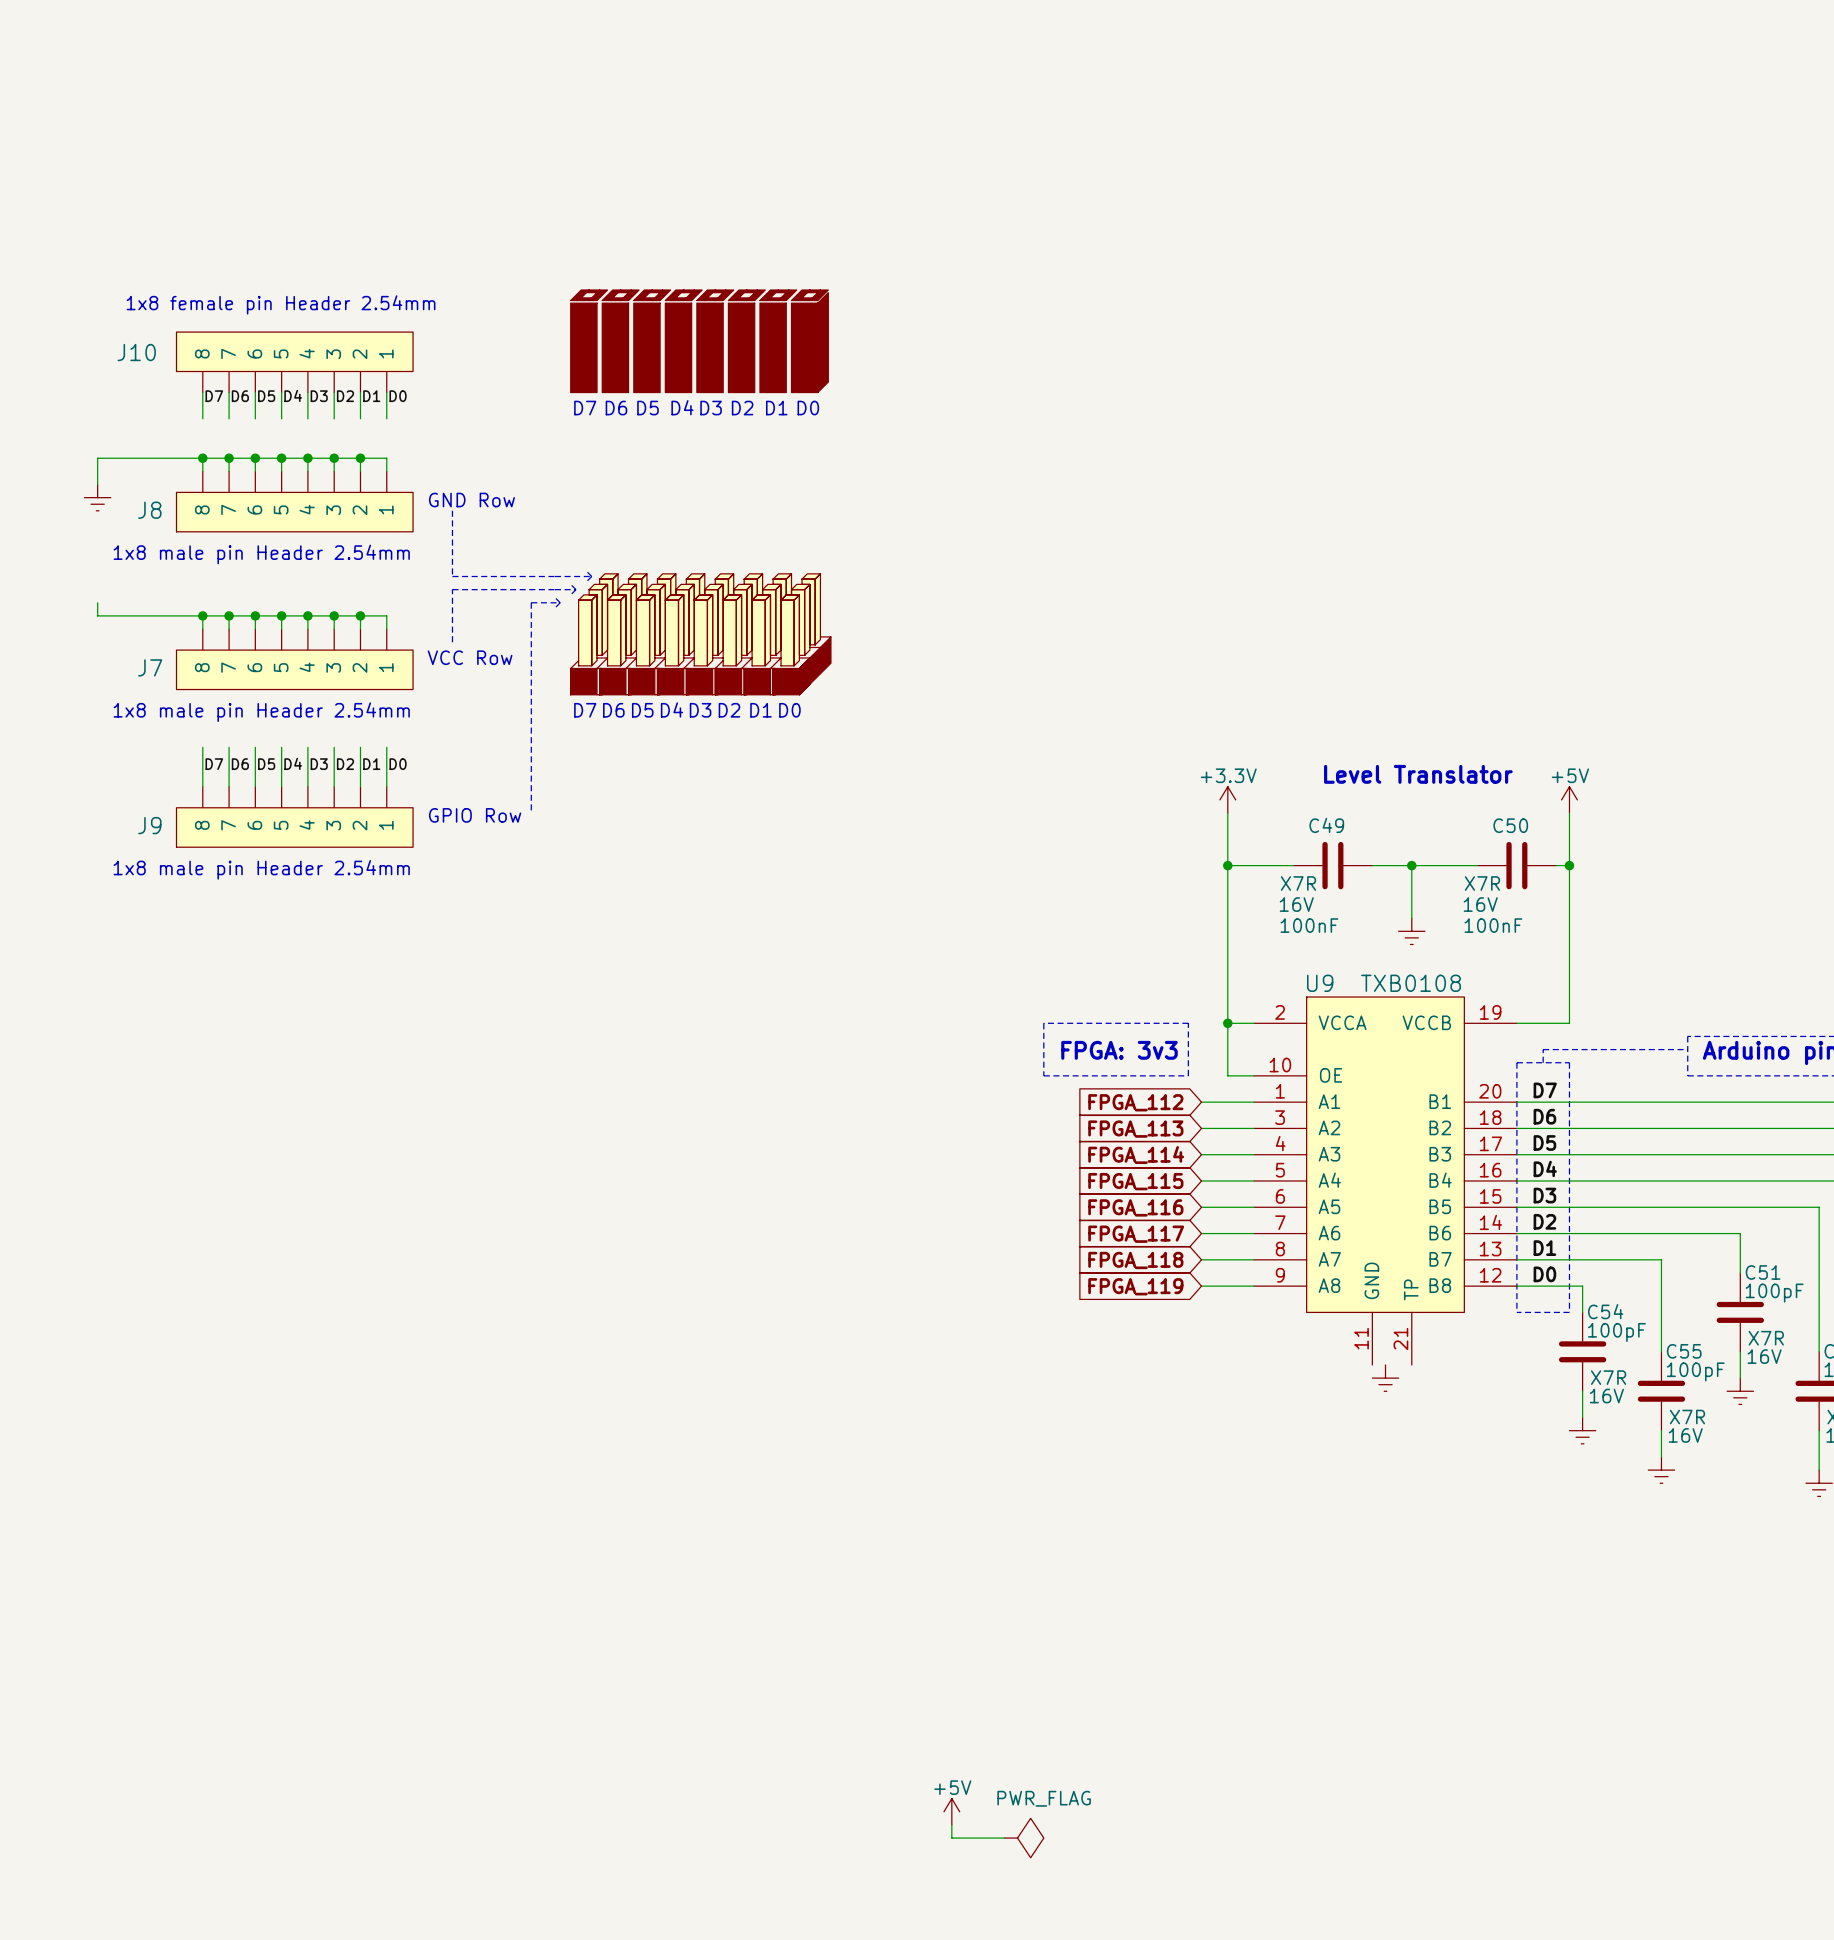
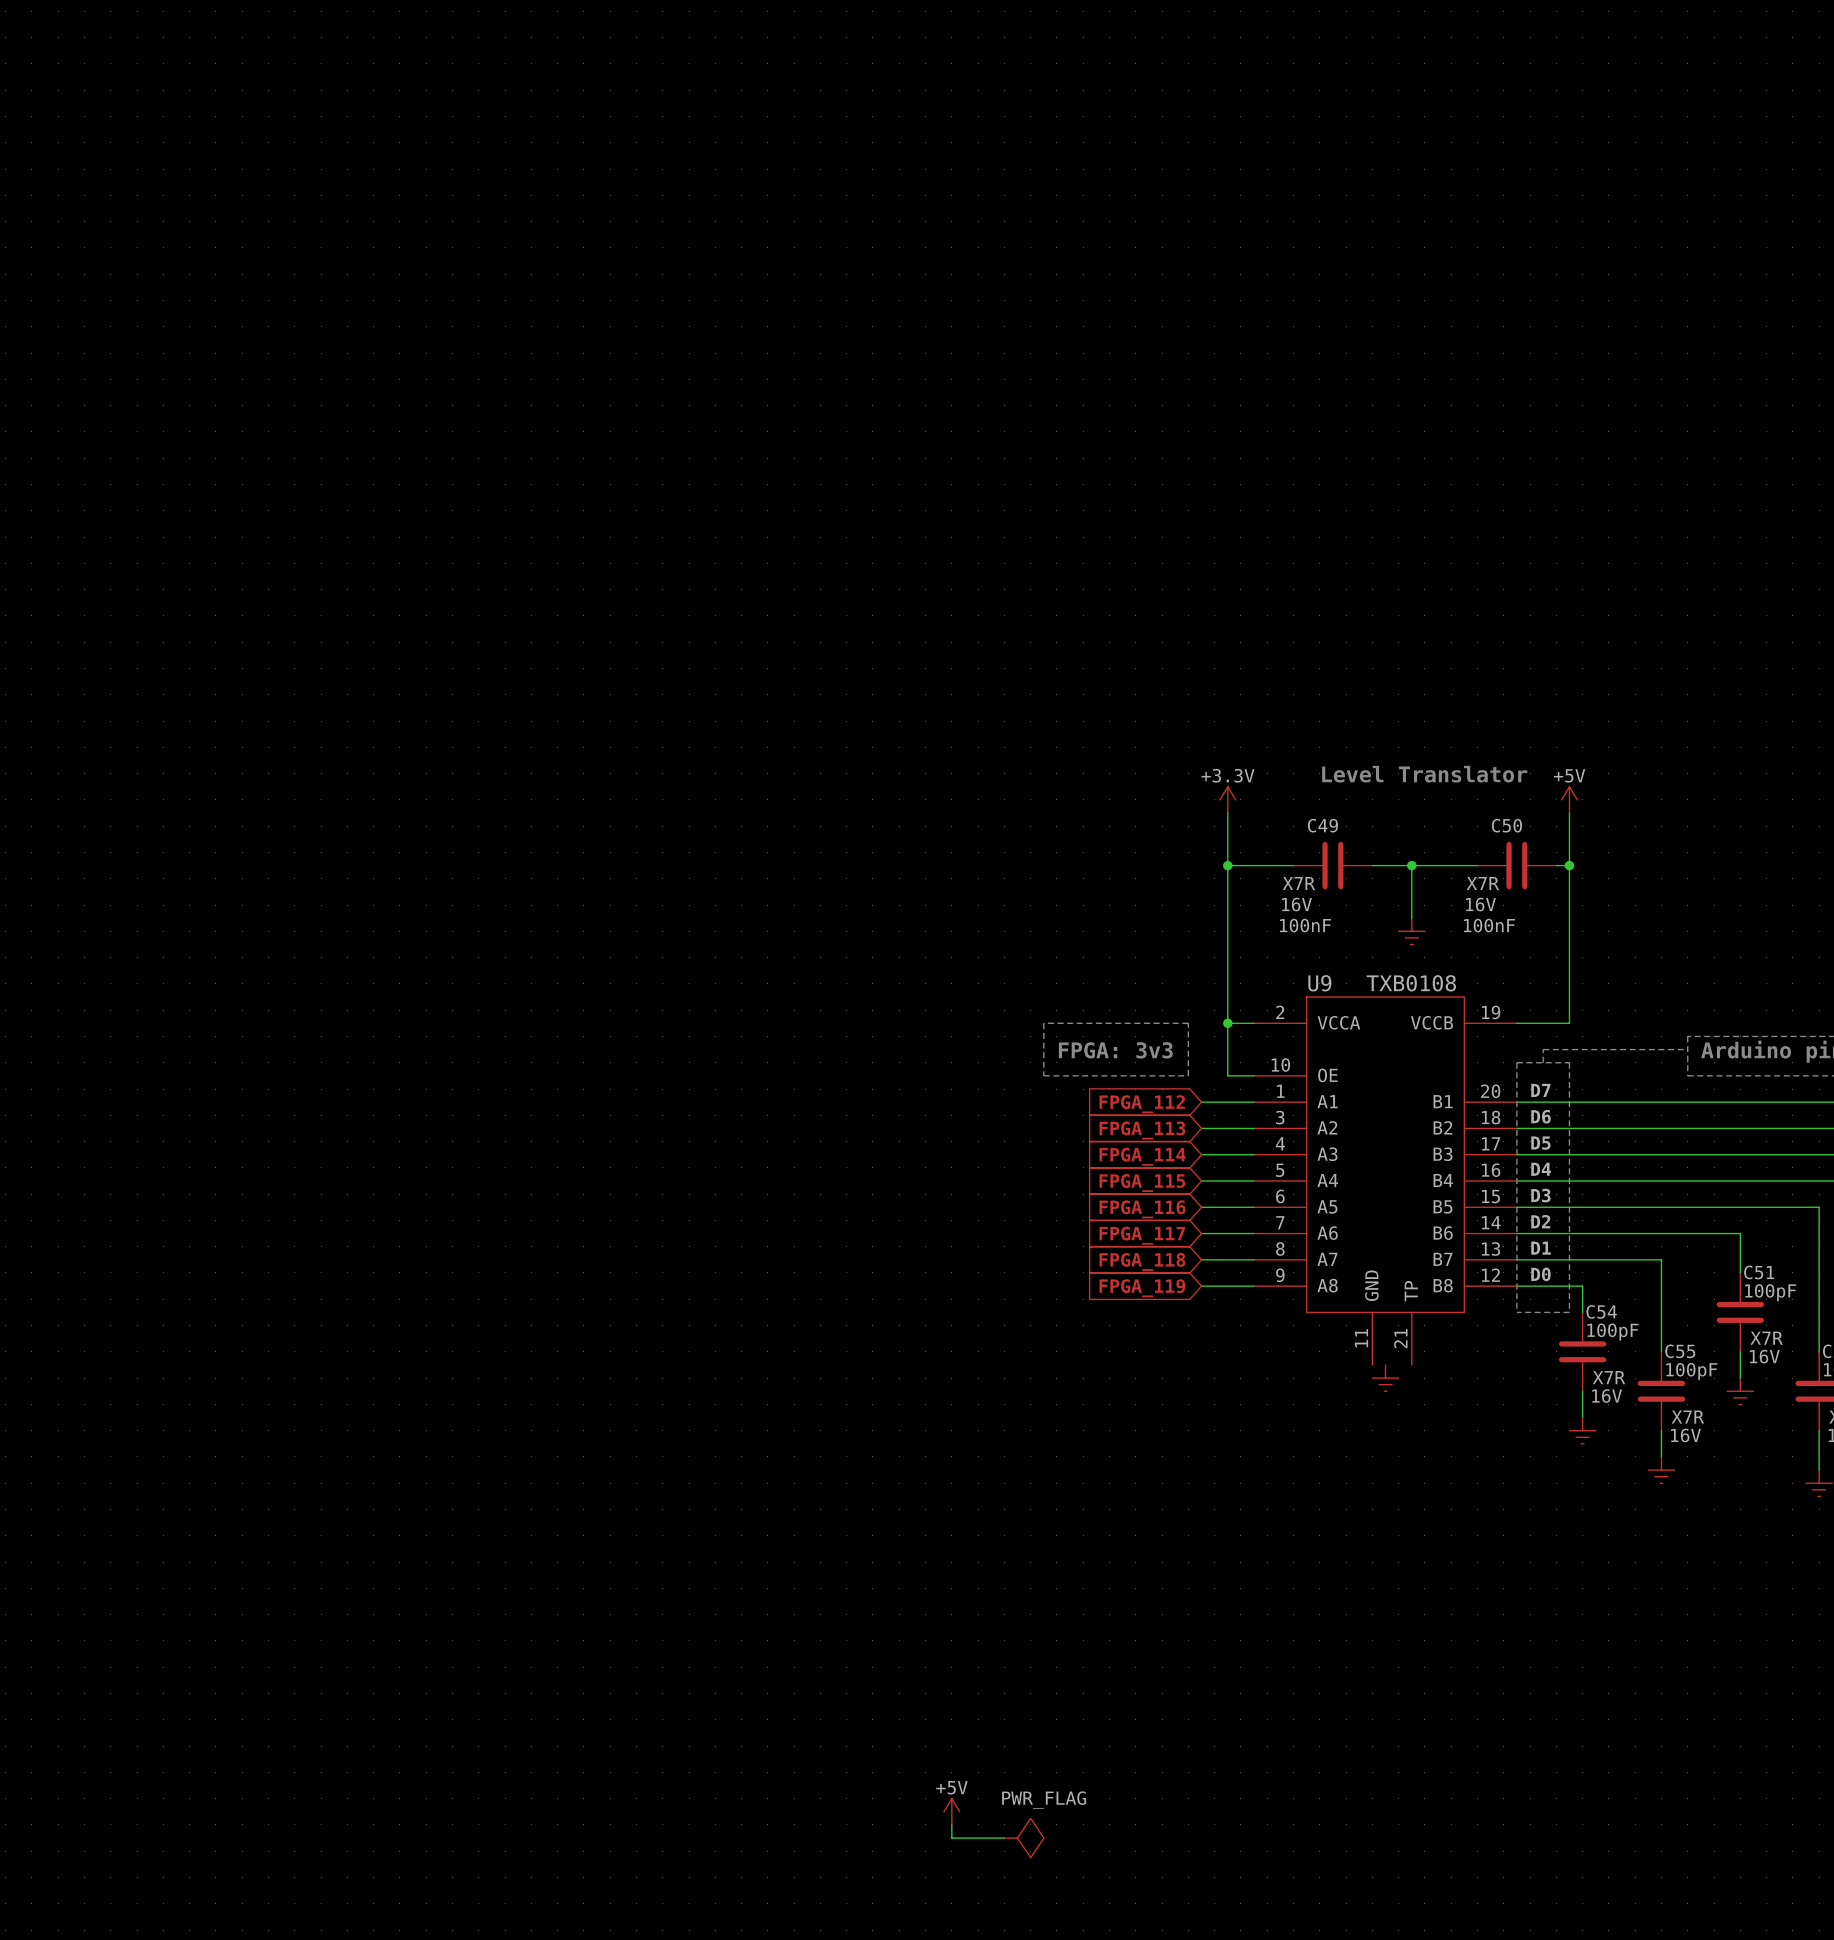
text: 1x8 female pin Header 2.54mm (281, 304) -> none
part: (699, 341) -> none
J10: (294, 362) -> none
wire: (202, 392) (202, 418) -> none
wire: (229, 392) (229, 418) -> none
wire: (255, 392) (255, 418) -> none
wire: (281, 392) (281, 418) -> none
wire: (307, 392) (307, 418) -> none
wire: (334, 392) (334, 418) -> none
wire: (360, 392) (360, 418) -> none
wire: (386, 392) (386, 418) -> none
label: D4 (293, 395) -> none
label: D7 (214, 396) -> none
label: D6 (240, 396) -> none
label: D5 (266, 396) -> none
label: D3 (319, 396) -> none
label: D2 (345, 396) -> none
label: D1 (371, 396) -> none
label: D0 (398, 396) -> none
text: D4 (682, 407) -> none
text: D7 (585, 408) -> none
text: D6 (616, 408) -> none
text: D5 (647, 408) -> none
text: D3 (711, 408) -> none
text: D2 (742, 408) -> none
text: D1 (776, 408) -> none
text: D0 (808, 408) -> none
wire: (202, 458) (202, 471) -> none
junction: (202, 458) -> none
wire: (229, 458) (229, 471) -> none
junction: (229, 458) -> none
wire: (255, 458) (255, 471) -> none
junction: (255, 458) -> none
wire: (281, 458) (281, 471) -> none
junction: (281, 458) -> none
wire: (307, 458) (307, 471) -> none
junction: (307, 458) -> none
wire: (334, 458) (334, 471) -> none
junction: (334, 458) -> none
wire: (360, 458) (360, 471) -> none
junction: (360, 458) -> none
wire: (386, 471) (386, 458) (97, 458) (97, 484) -> none
power symbol: (97, 497) -> none
text: GND Row (471, 500) -> none
J8: (294, 501) -> none
line: (452, 510) (452, 576) (591, 576) -> none
text: 1x8 male pin Header 2.54mm (261, 554) -> none
line: (586, 571) (591, 576) -> none
line: (591, 576) (586, 581) -> none
line: (570, 584) (575, 589) -> none
line: (575, 589) (570, 594) -> none
line: (575, 589) (452, 589) (452, 642) -> none
line: (554, 597) (560, 602) (554, 608) -> none
wire: (97, 602) (97, 615) (386, 615) (386, 629) -> none
line: (557, 602) (531, 602) (531, 813) -> none
wire: (202, 615) (202, 629) -> none
junction: (202, 615) -> none
wire: (229, 615) (229, 629) -> none
junction: (229, 615) -> none
wire: (255, 615) (255, 629) -> none
junction: (255, 615) -> none
wire: (281, 615) (281, 629) -> none
junction: (281, 615) -> none
wire: (307, 615) (307, 629) -> none
junction: (307, 615) -> none
wire: (334, 615) (334, 629) -> none
junction: (334, 615) -> none
wire: (360, 615) (360, 629) -> none
junction: (360, 615) -> none
part: (700, 634) -> none
text: VCC Row (470, 657) -> none
J7: (294, 659) -> none
text: D4 (671, 709) -> none
text: D7 (585, 710) -> none
text: D6 (613, 710) -> none
text: D5 (642, 710) -> none
text: D3 (700, 710) -> none
text: D2 (729, 710) -> none
text: D1 (761, 710) -> none
text: D0 (789, 710) -> none
text: 1x8 male pin Header 2.54mm (261, 712) -> none
wire: (202, 747) (202, 786) -> none
wire: (229, 747) (229, 786) -> none
wire: (255, 747) (255, 786) -> none
wire: (281, 747) (281, 786) -> none
wire: (307, 747) (307, 786) -> none
wire: (334, 747) (334, 786) -> none
wire: (360, 747) (360, 786) -> none
wire: (386, 747) (386, 786) -> none
label: D4 (293, 763) -> none
label: D7 (214, 764) -> none
label: D6 (240, 764) -> none
label: D5 (266, 764) -> none
label: D3 (319, 764) -> none
label: D2 (345, 764) -> none
label: D1 (371, 764) -> none
label: D0 (398, 764) -> none
text: GPIO Row (475, 815) -> none
J9: (294, 816) -> none
text: 1x8 male pin Header 2.54mm (261, 869) -> none

